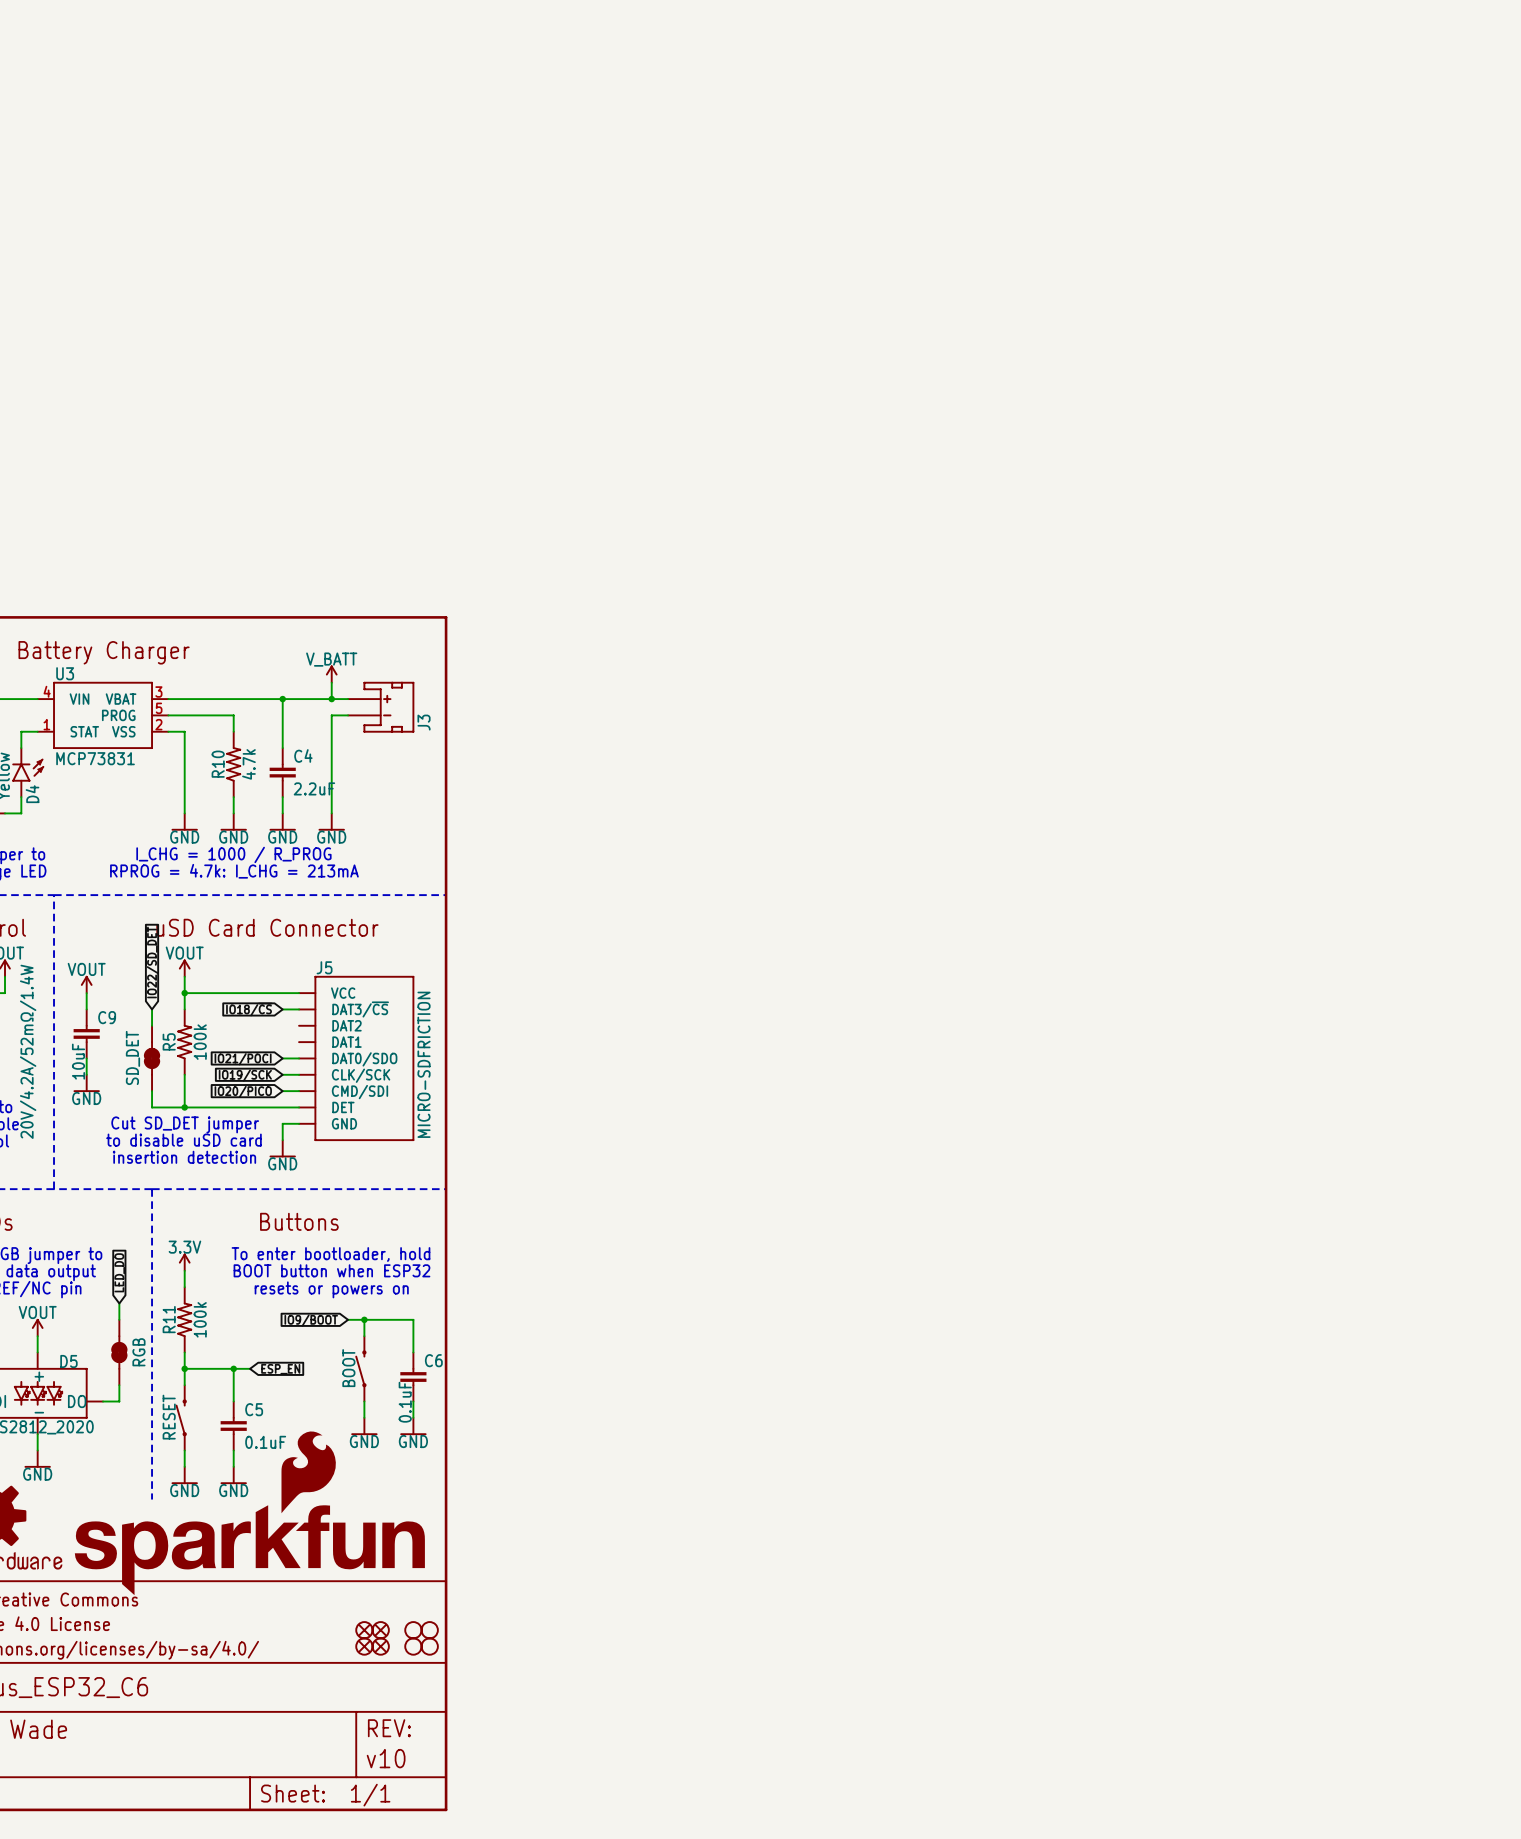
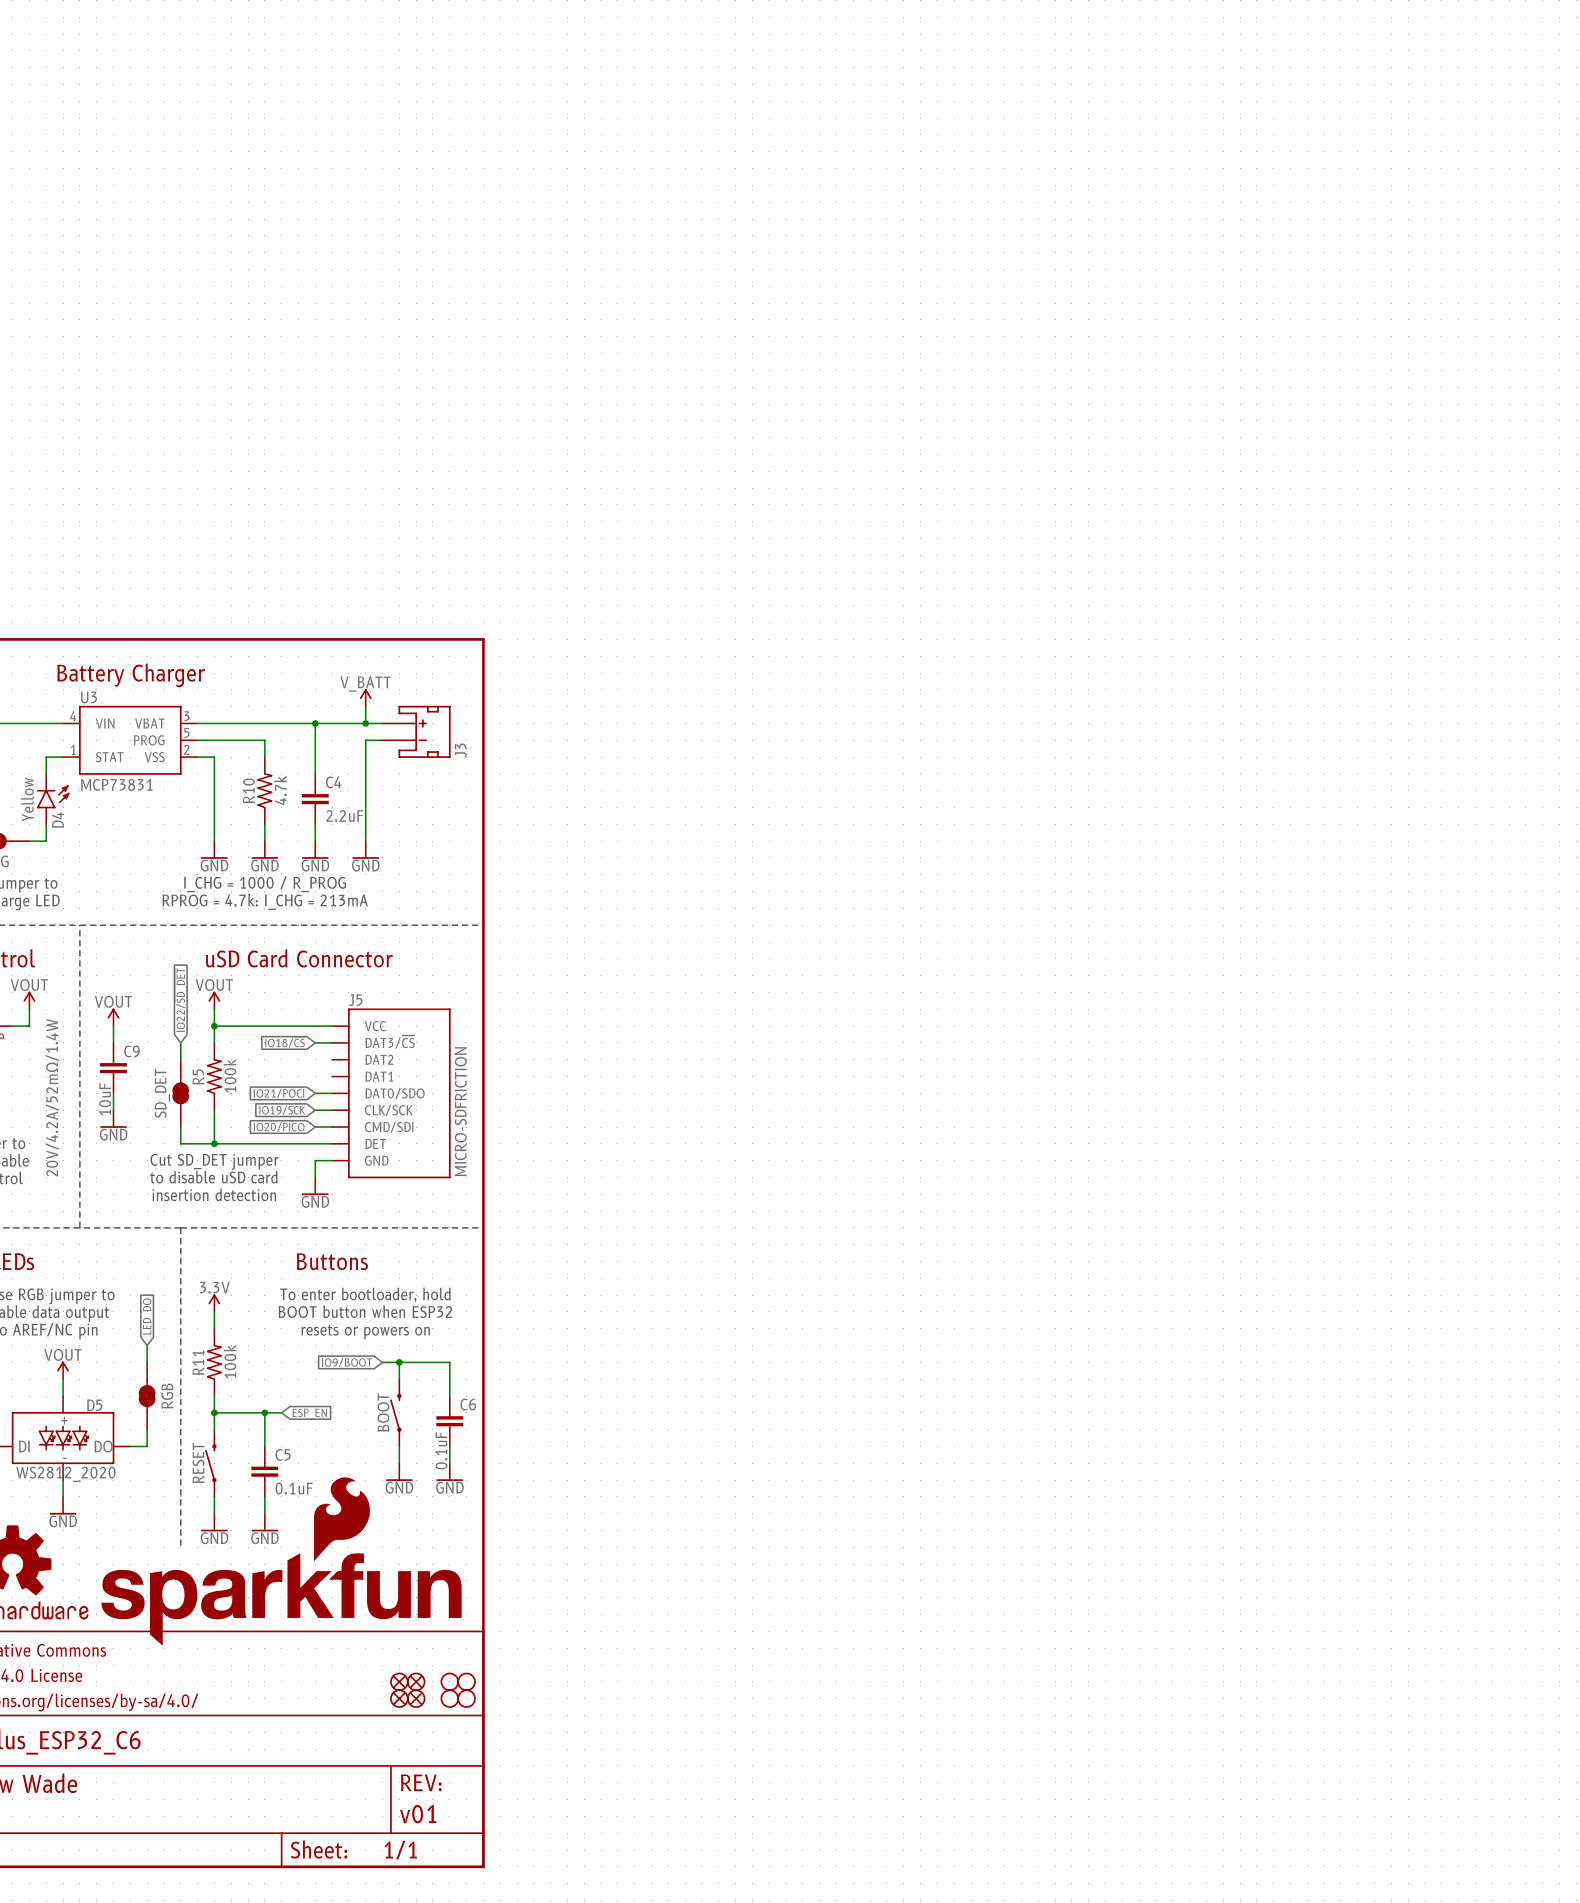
part text: v10 (386, 1758) -> v01 (418, 1814)

